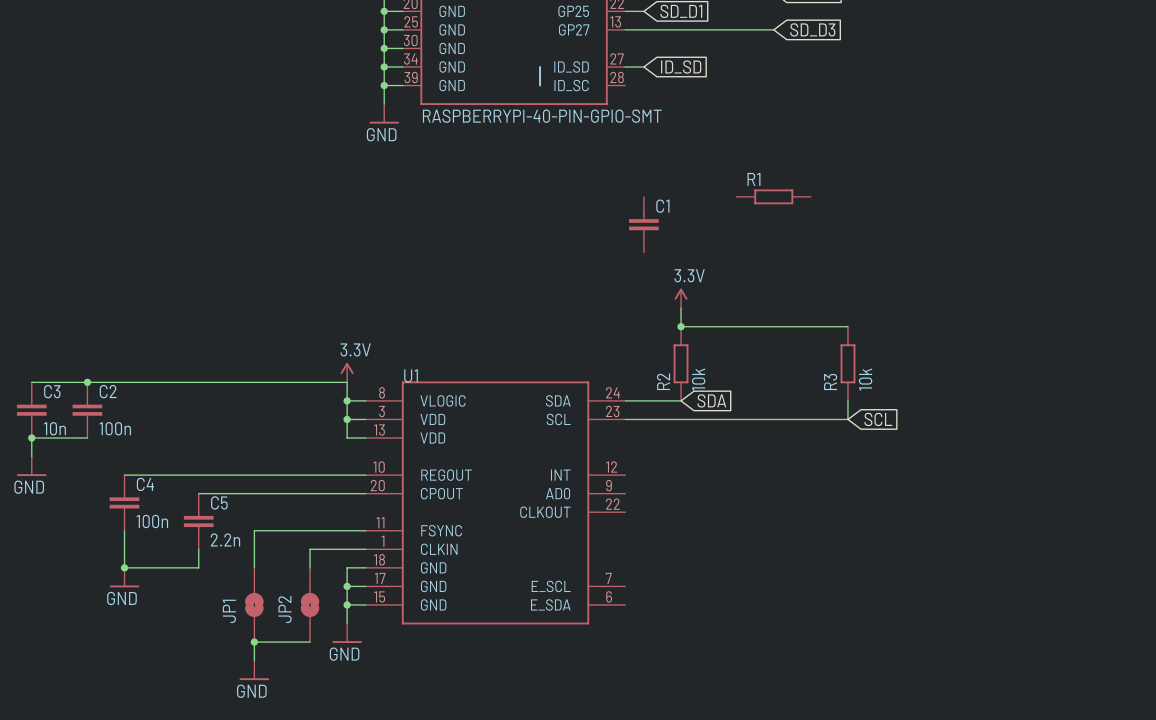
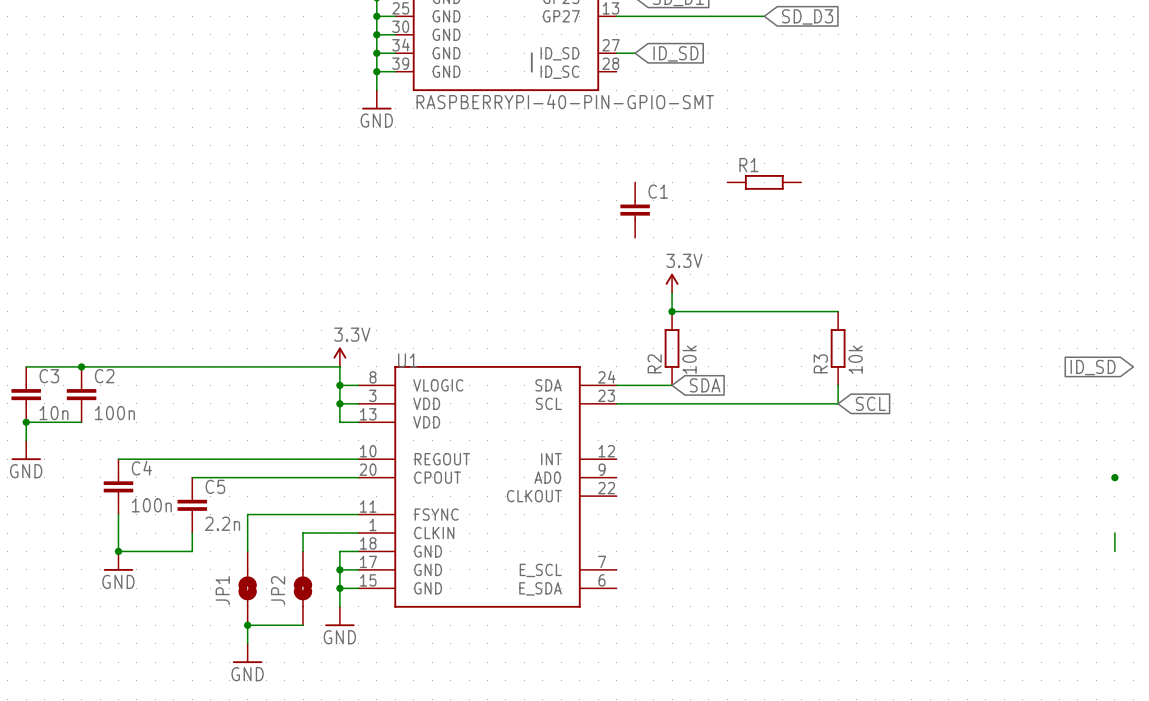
global label: none -> ID_SD (1093, 367)
junction: none -> (1114, 477)
wire: none -> (1114, 533) (1114, 551)

